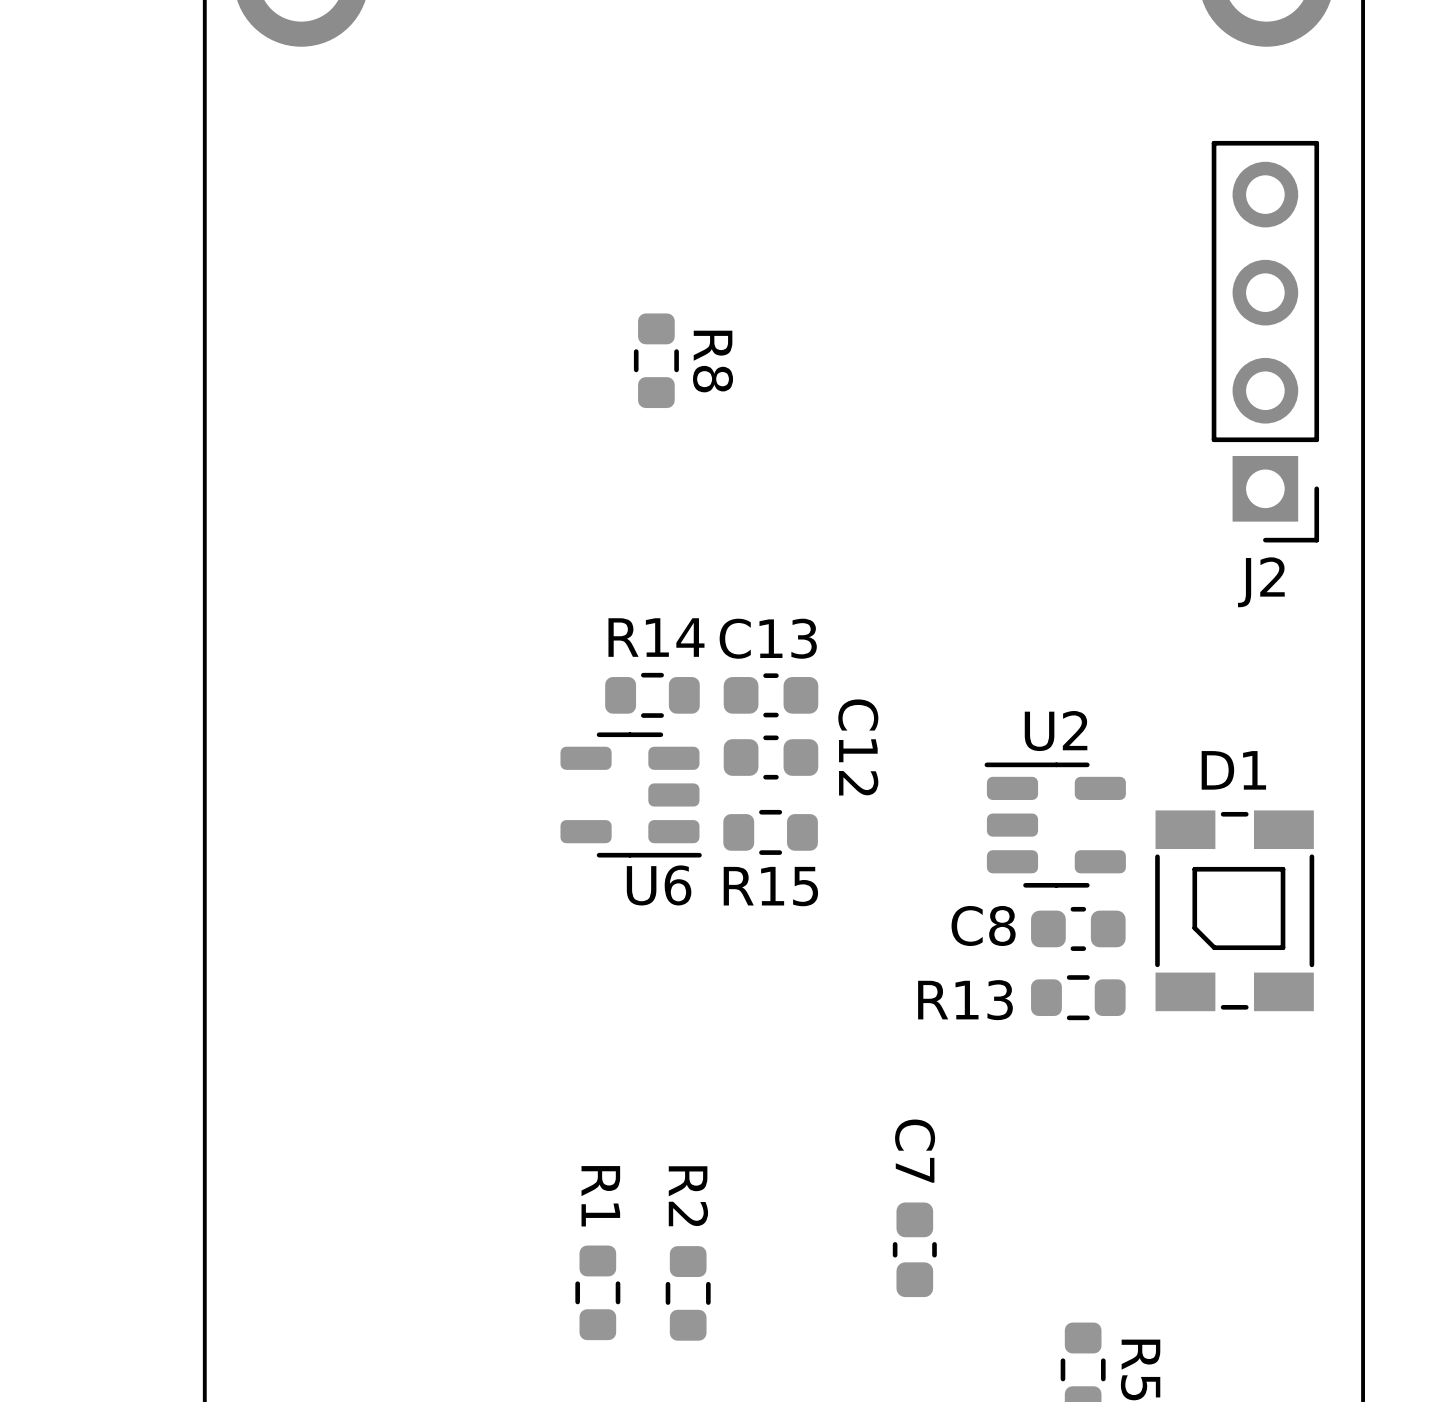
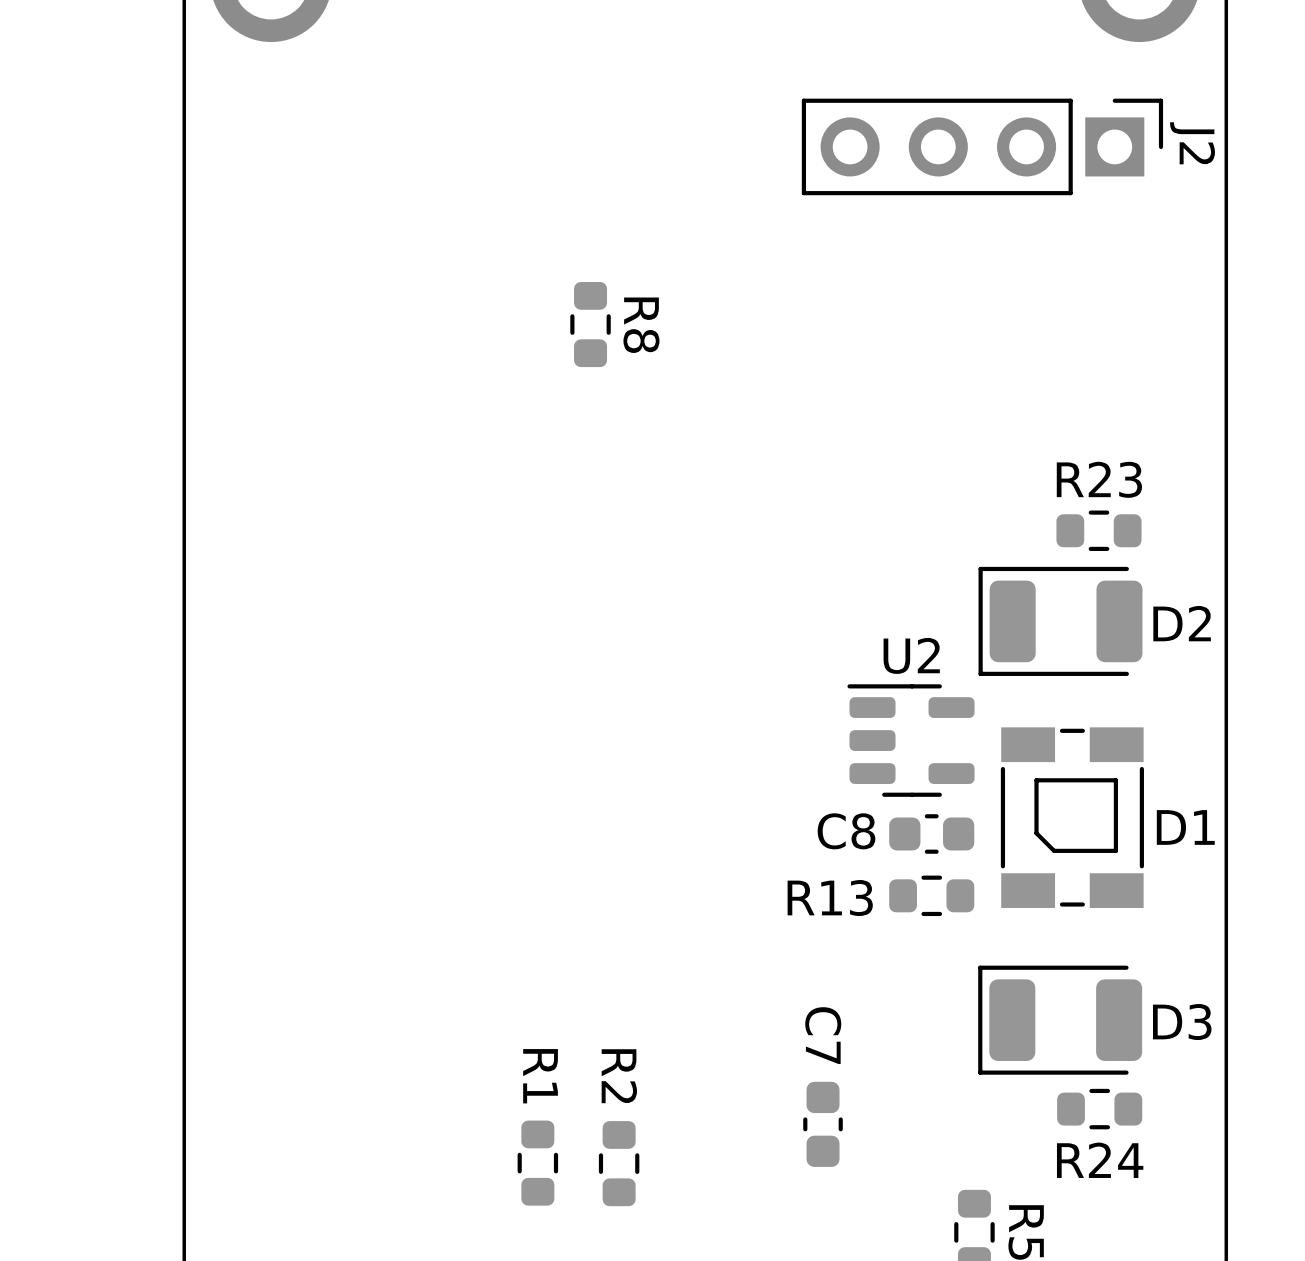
J2 rotation: 0° (1265, 341) -> 90° counterclockwise (982, 146)
J2 position: (1265, 341) -> (982, 146)
R23: none -> (1098, 530)
D2: none -> (1060, 621)
R14: (652, 695) -> none
C13: (770, 695) -> none
C12: (770, 757) -> none
D1 name position: D1 (1233, 770) -> D1 (1185, 827)
U6: (631, 794) -> none
U2 position: (1055, 825) -> (910, 740)
R15: (770, 832) -> none
D1 position: (1234, 910) -> (1072, 817)
C8 position: (1078, 928) -> (931, 833)
R13 position: (1078, 997) -> (931, 895)
D3: none -> (1060, 1020)
R24: none -> (1099, 1109)

